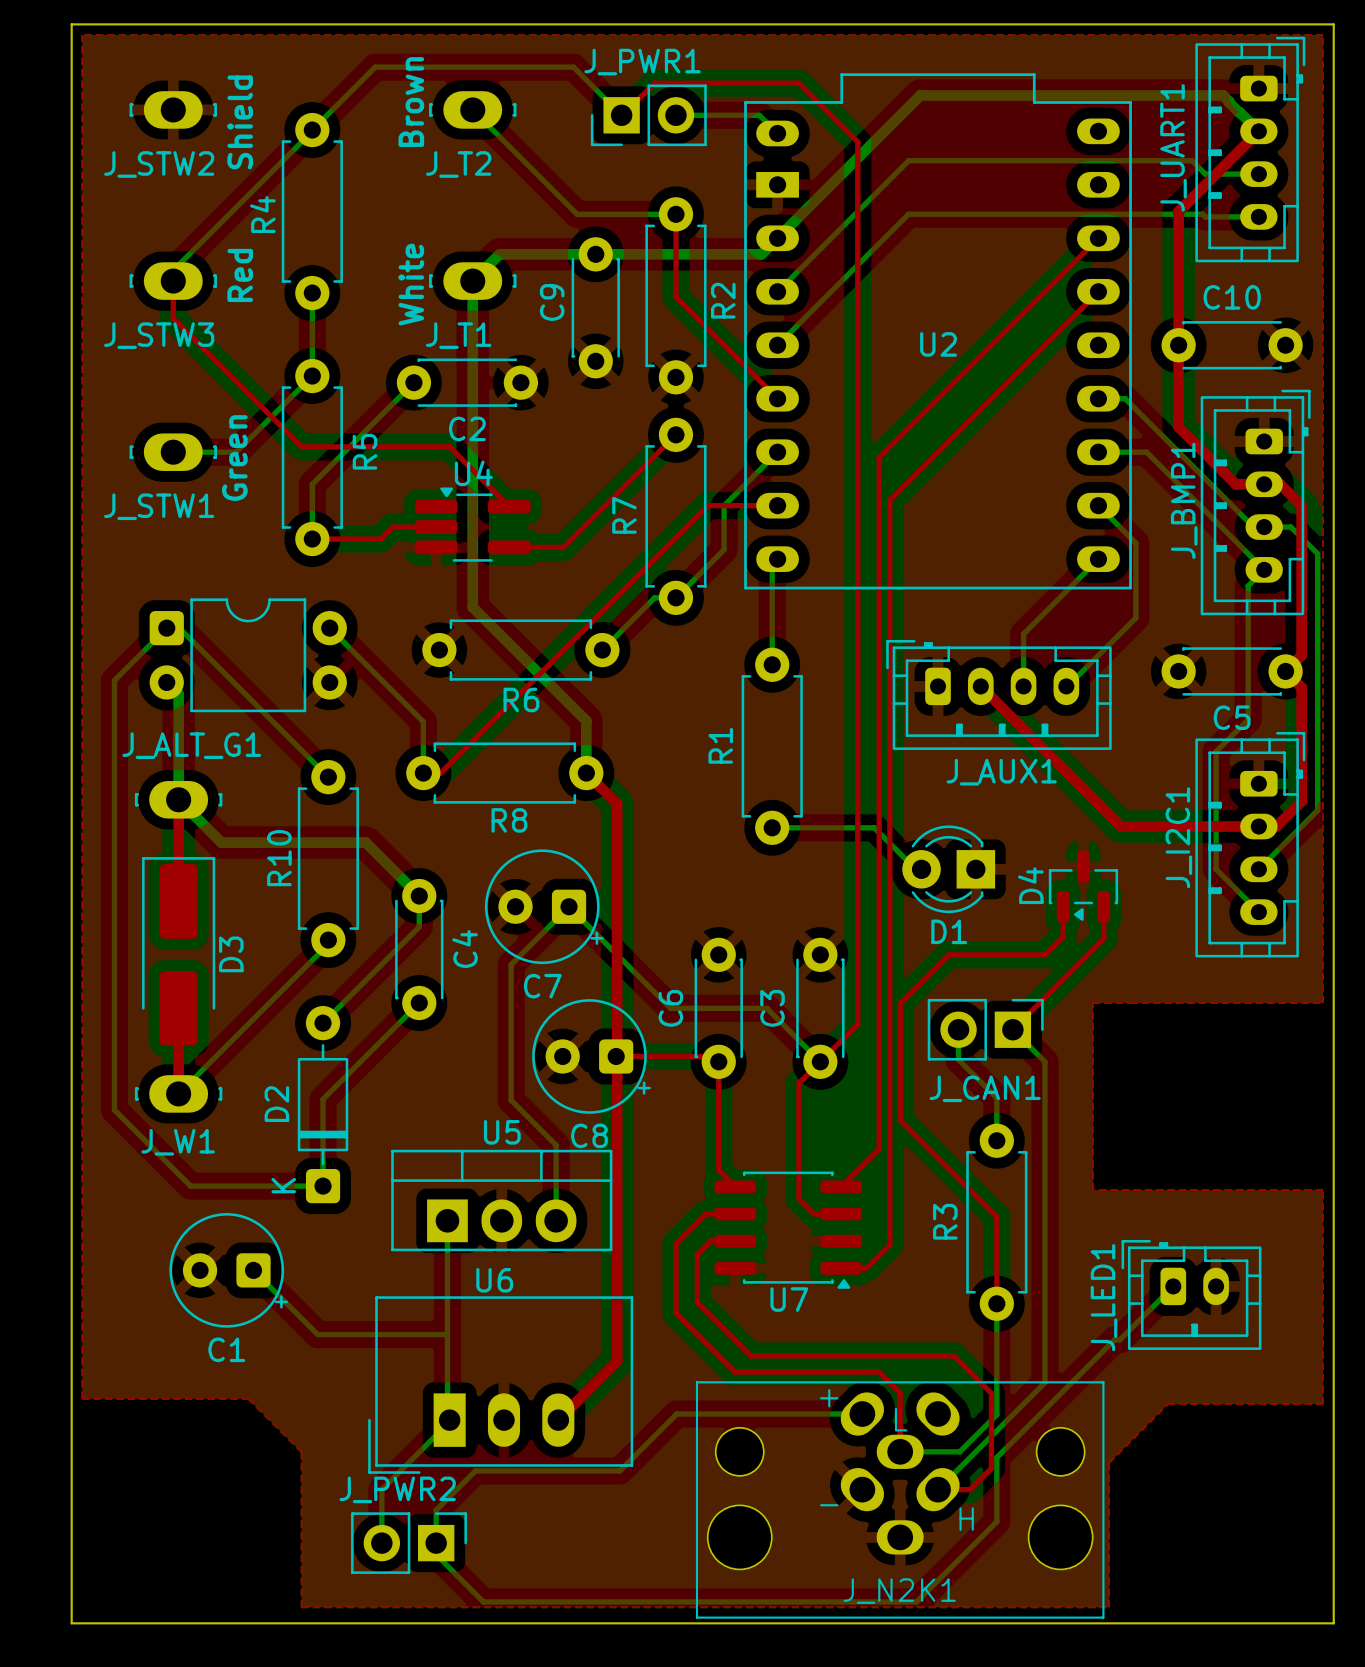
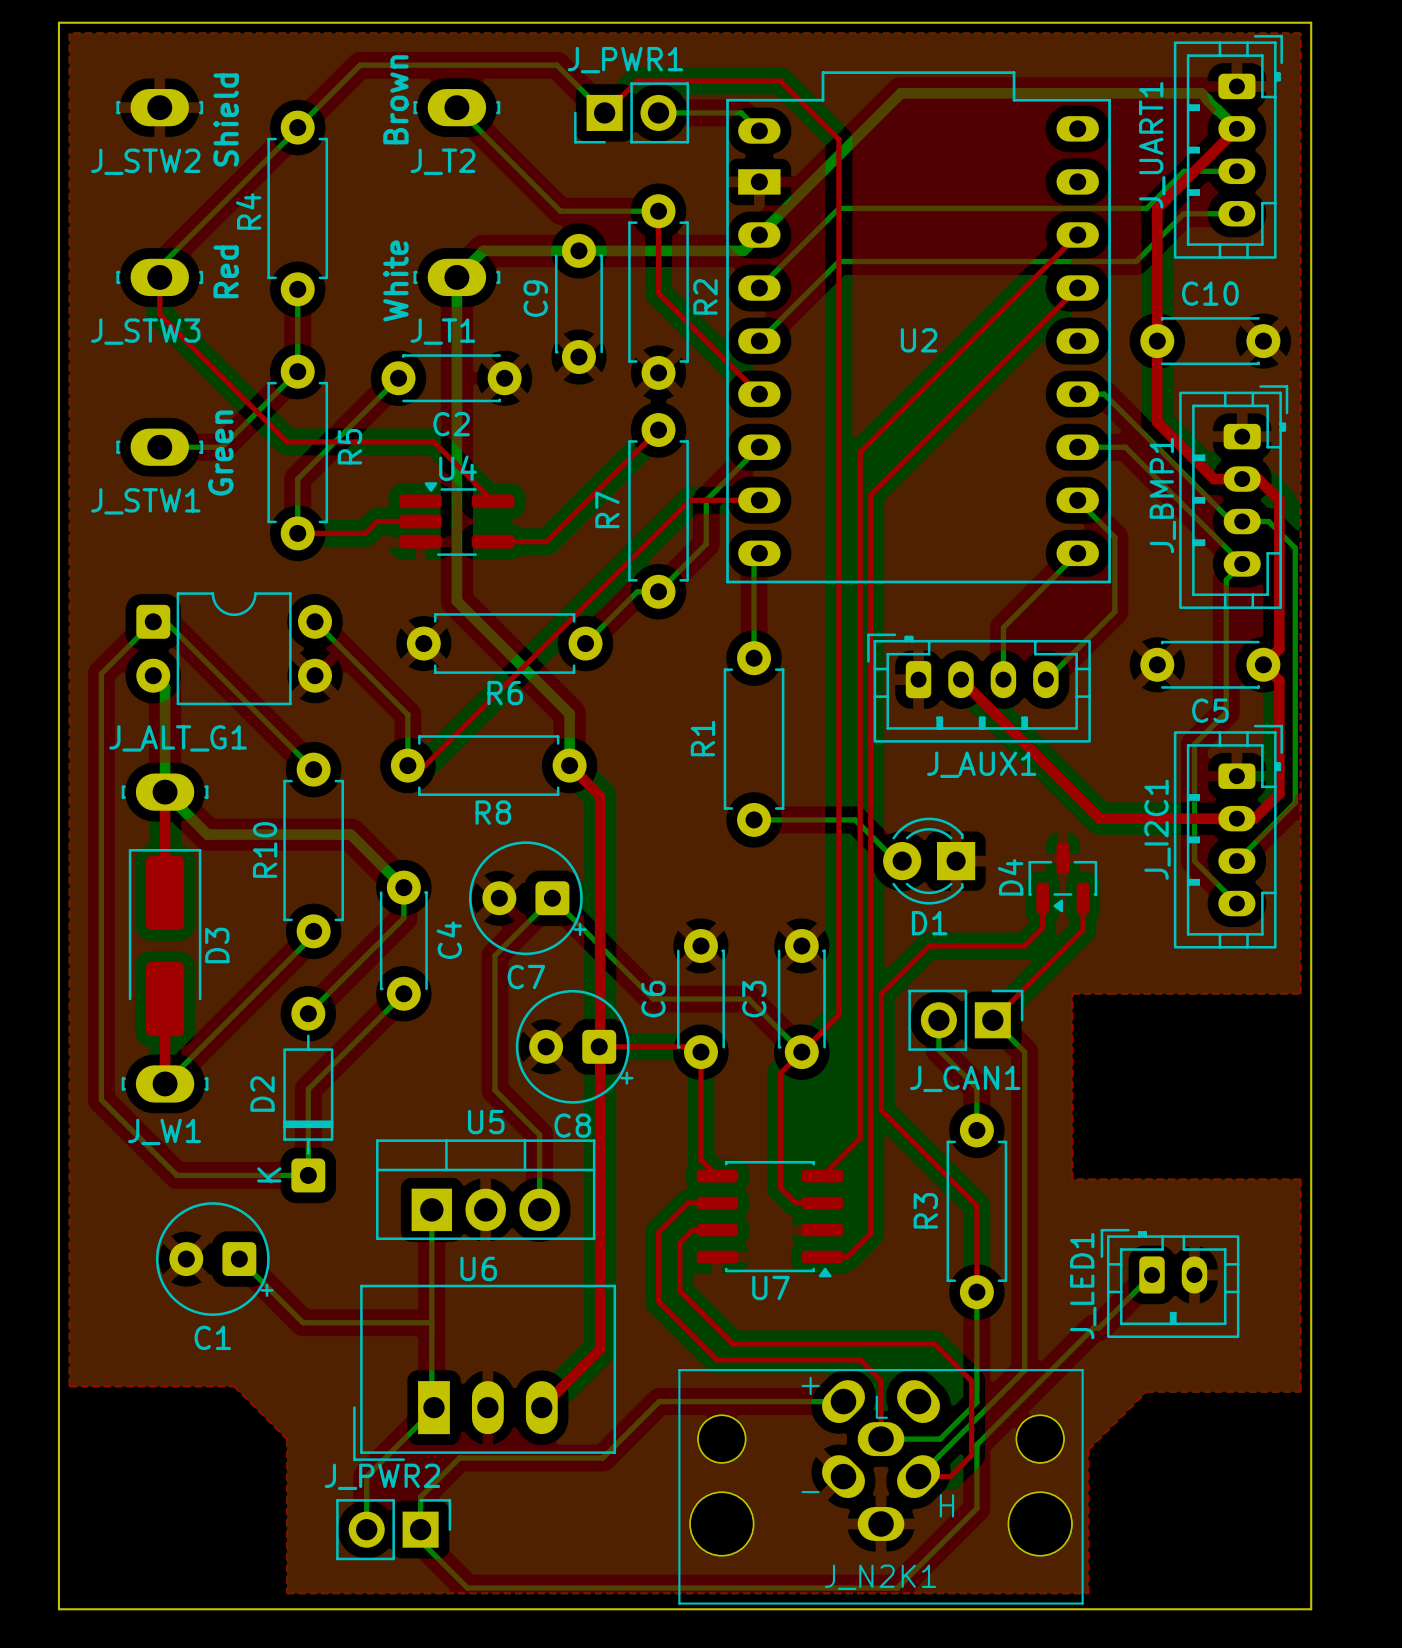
bottom track: (1205, 174) (1192, 160) (908, 160) (857, 211) -> (1183, 171) (1146, 208) (838, 208)
bottom track: (1205, 216) (1202, 214) (908, 214) (857, 265) -> (1183, 213) (1136, 261) (838, 261)

